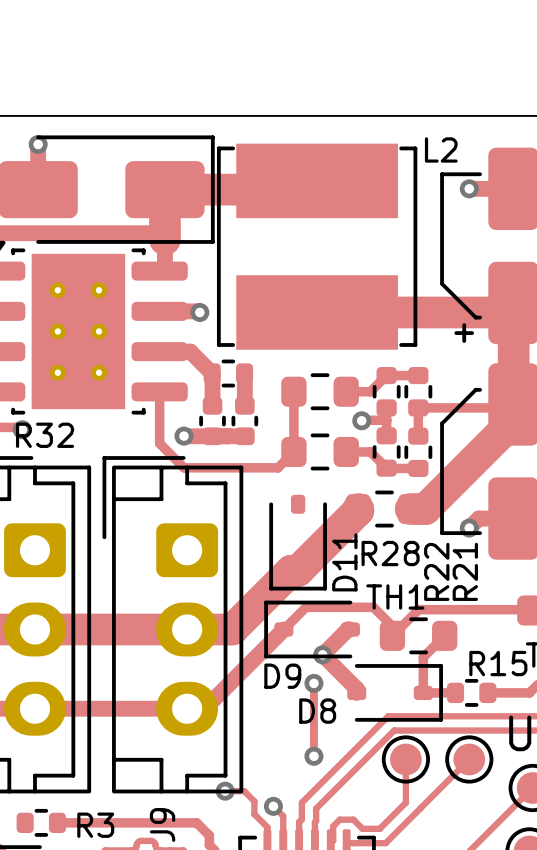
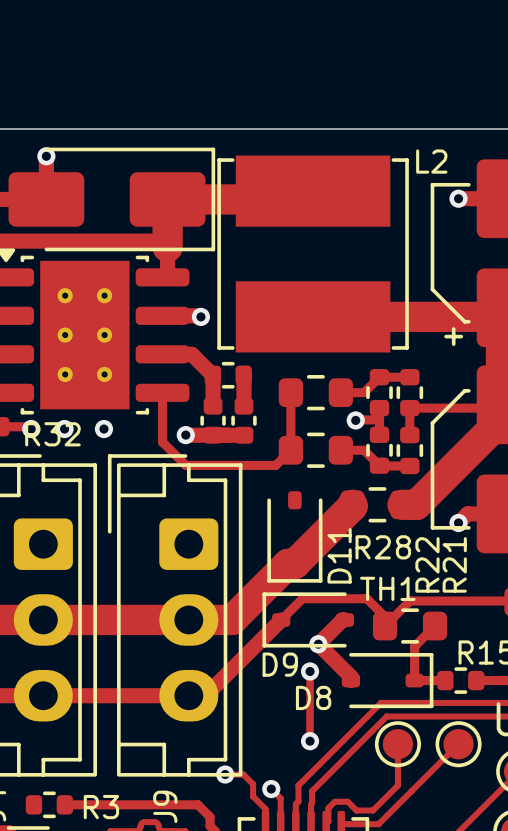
via: none -> (64, 429)
via: none -> (103, 429)

